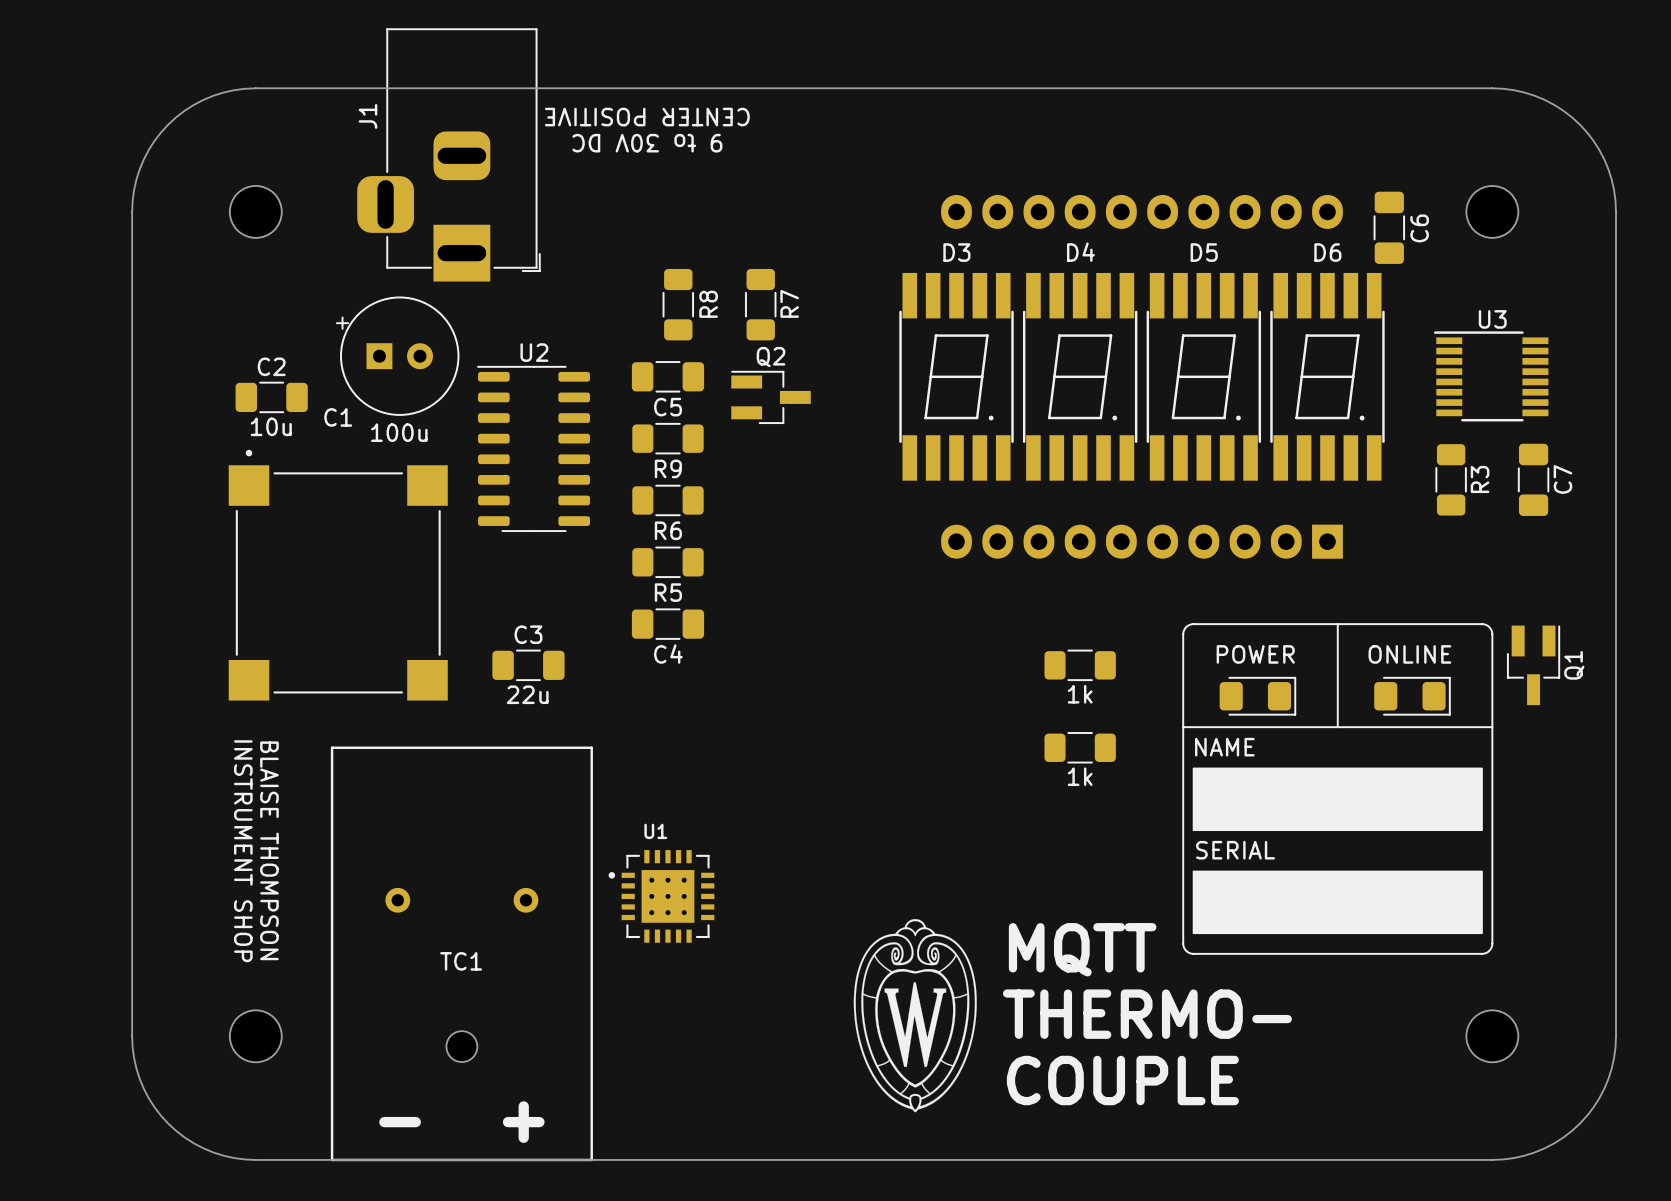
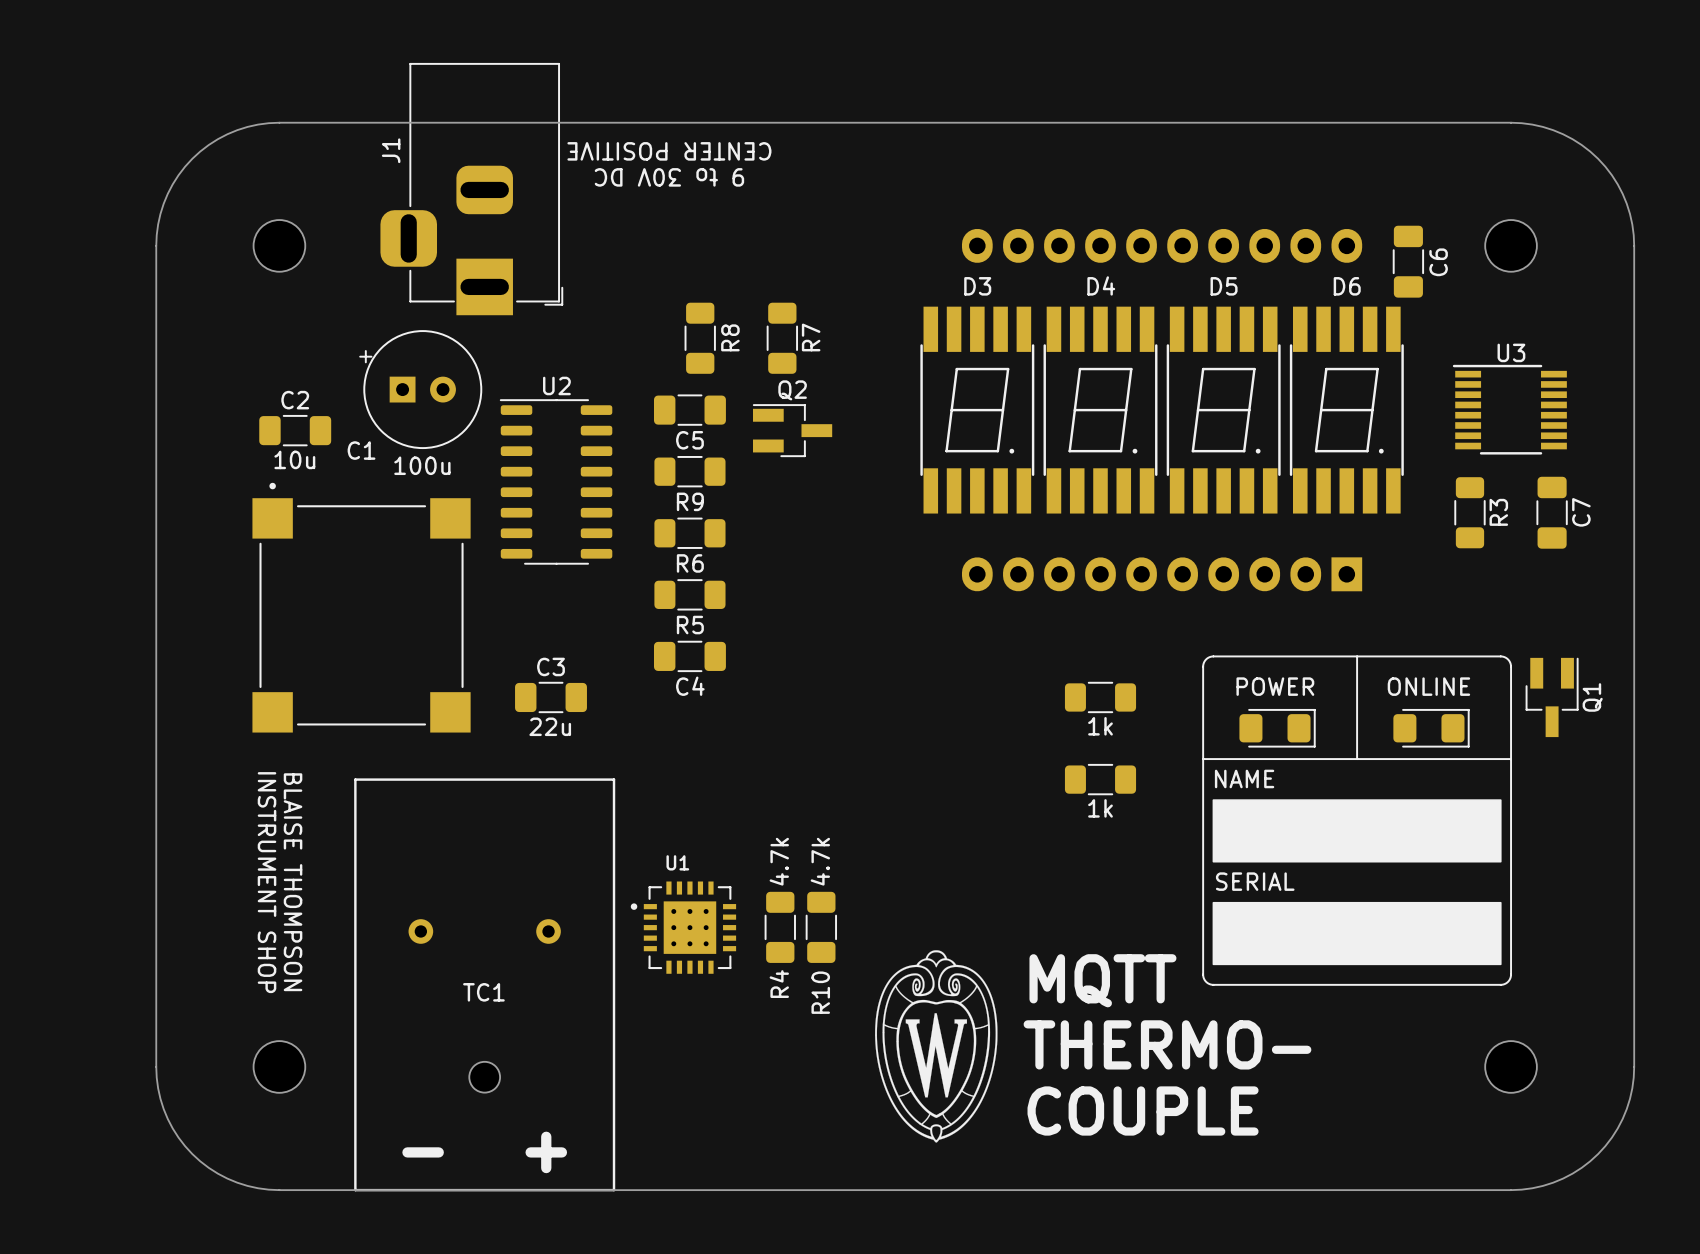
R4: none -> 4.7k (780, 927)
R10: none -> 4.7k (821, 927)

